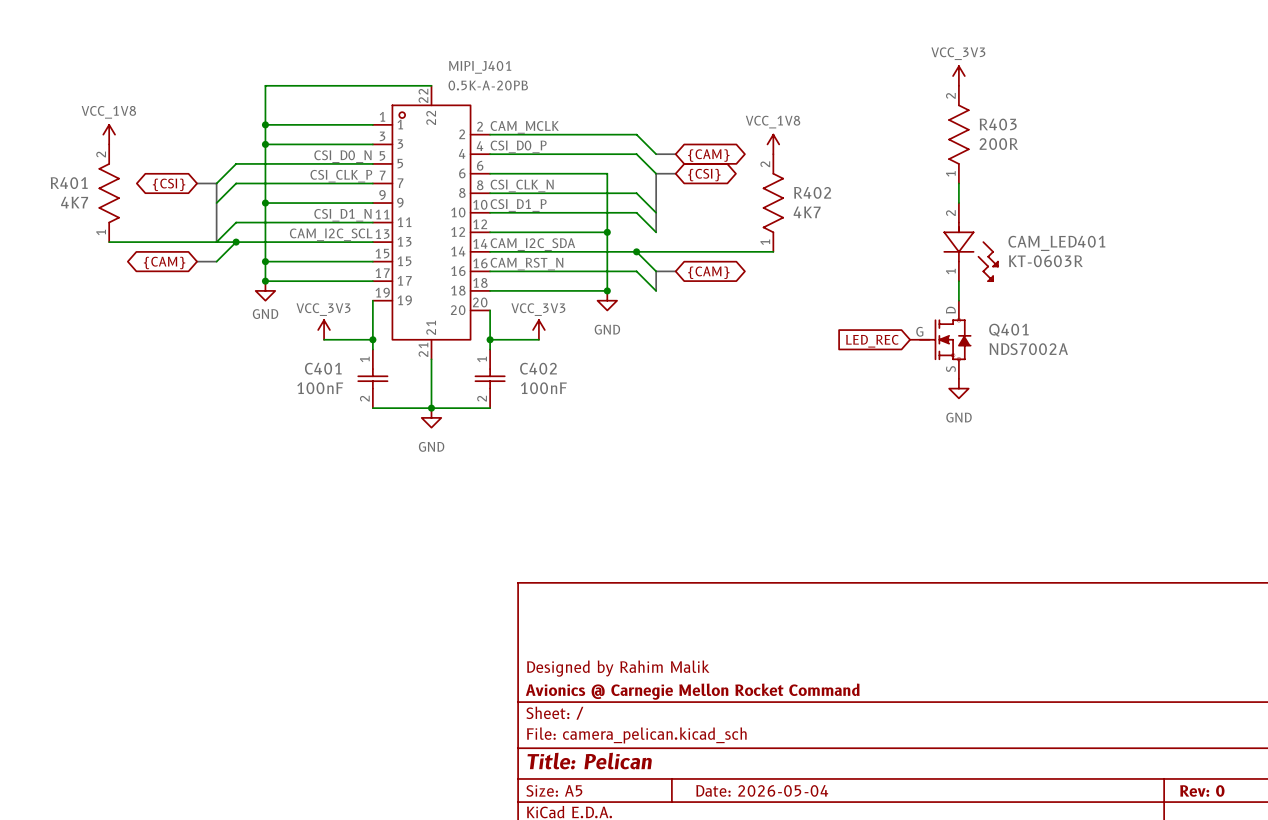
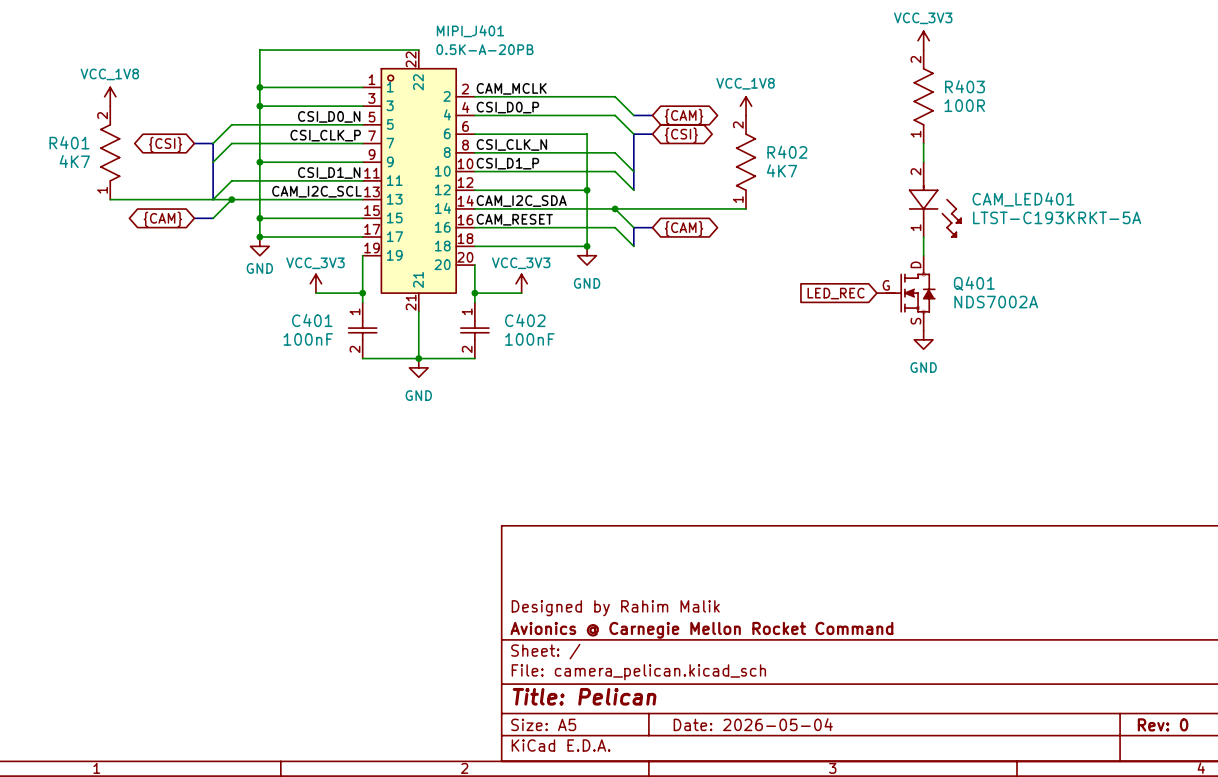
R403 value: 200R (998, 144) -> 100R (964, 105)
CAM_LED401 value: KT-0603R (1045, 261) -> LTST-C193KRKT-5A (1057, 217)
label: CAM_RST_N (526, 264) -> CAM_RESET (514, 219)

